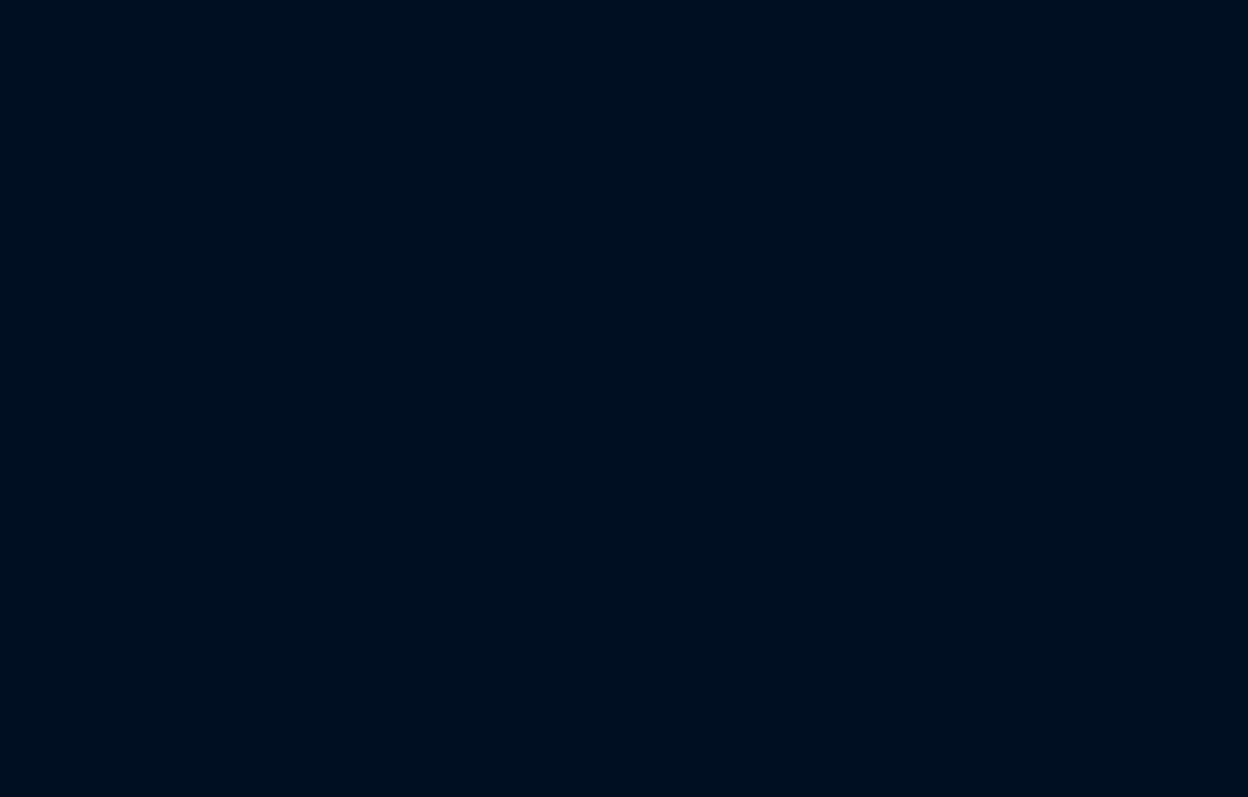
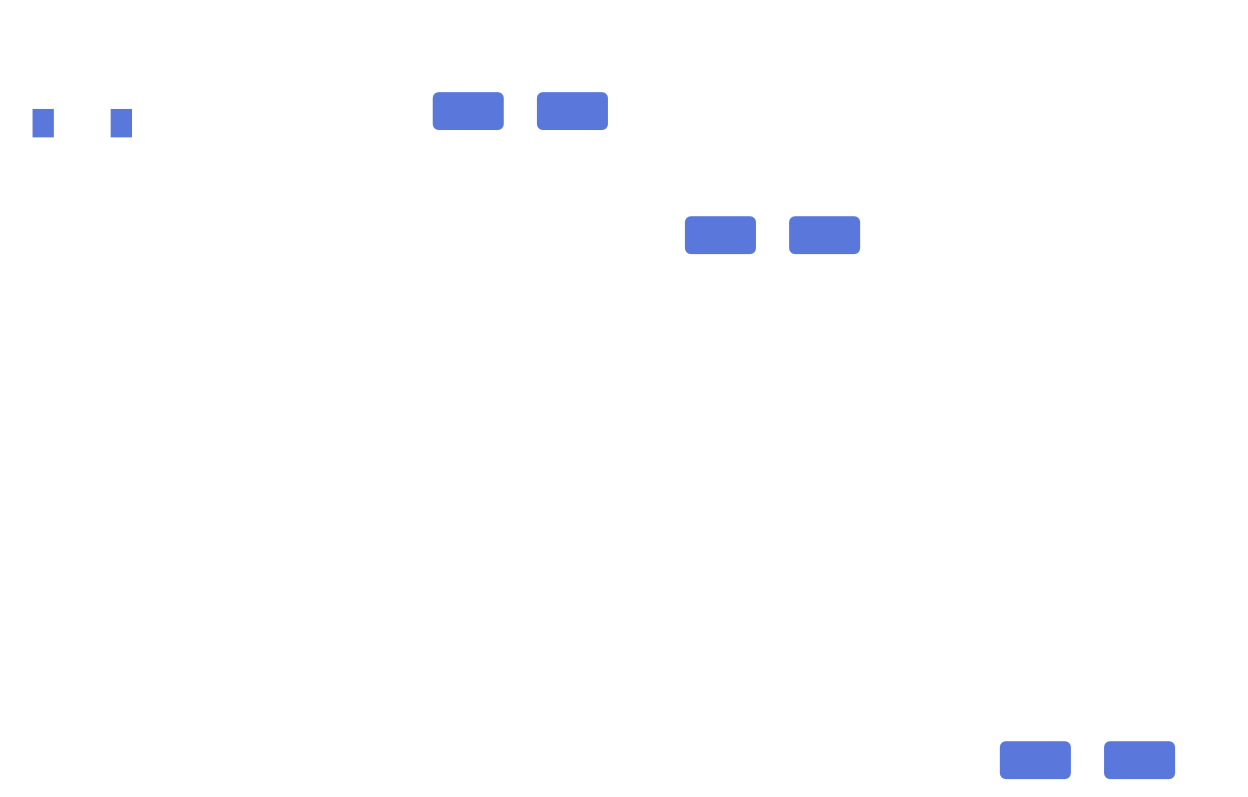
part: none -> (520, 111)
part: none -> (82, 123)
part: none -> (772, 235)
part: none -> (1087, 760)

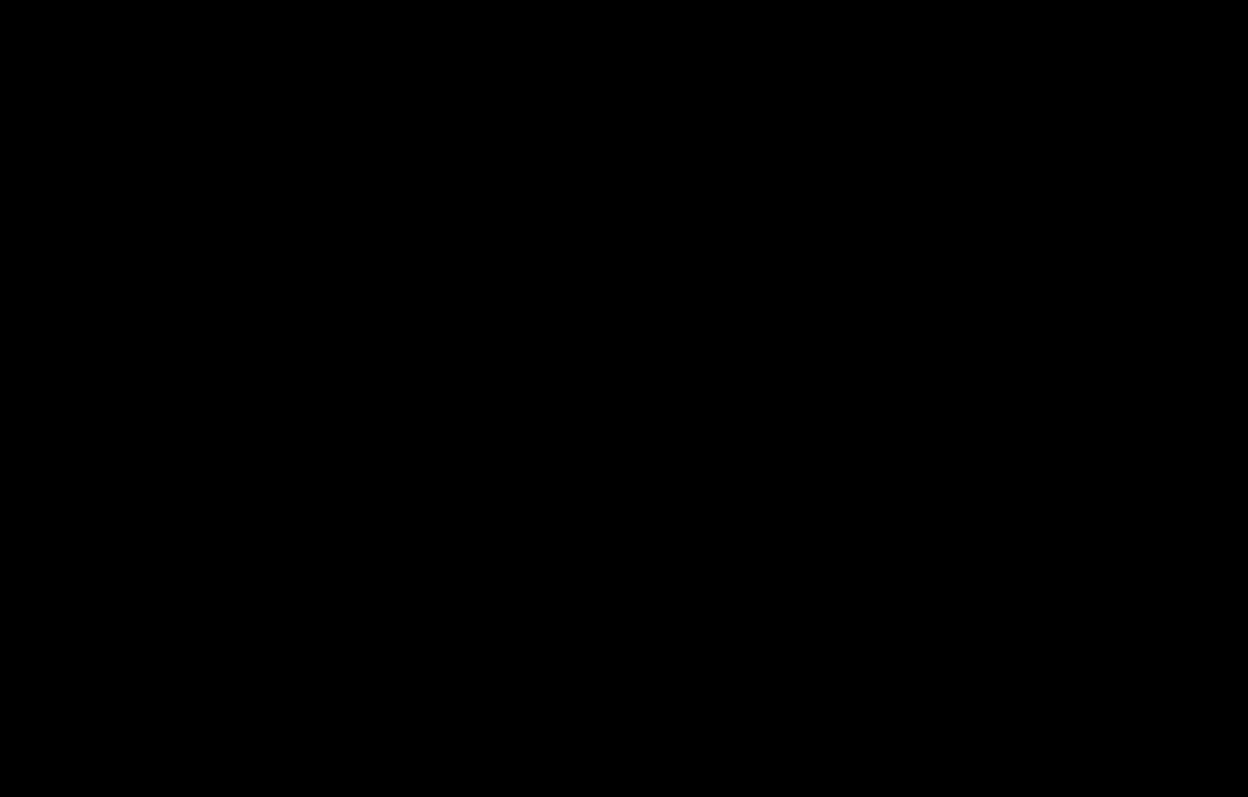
part: (520, 111) -> none
part: (82, 123) -> none
part: (772, 235) -> none
part: (1087, 760) -> none

